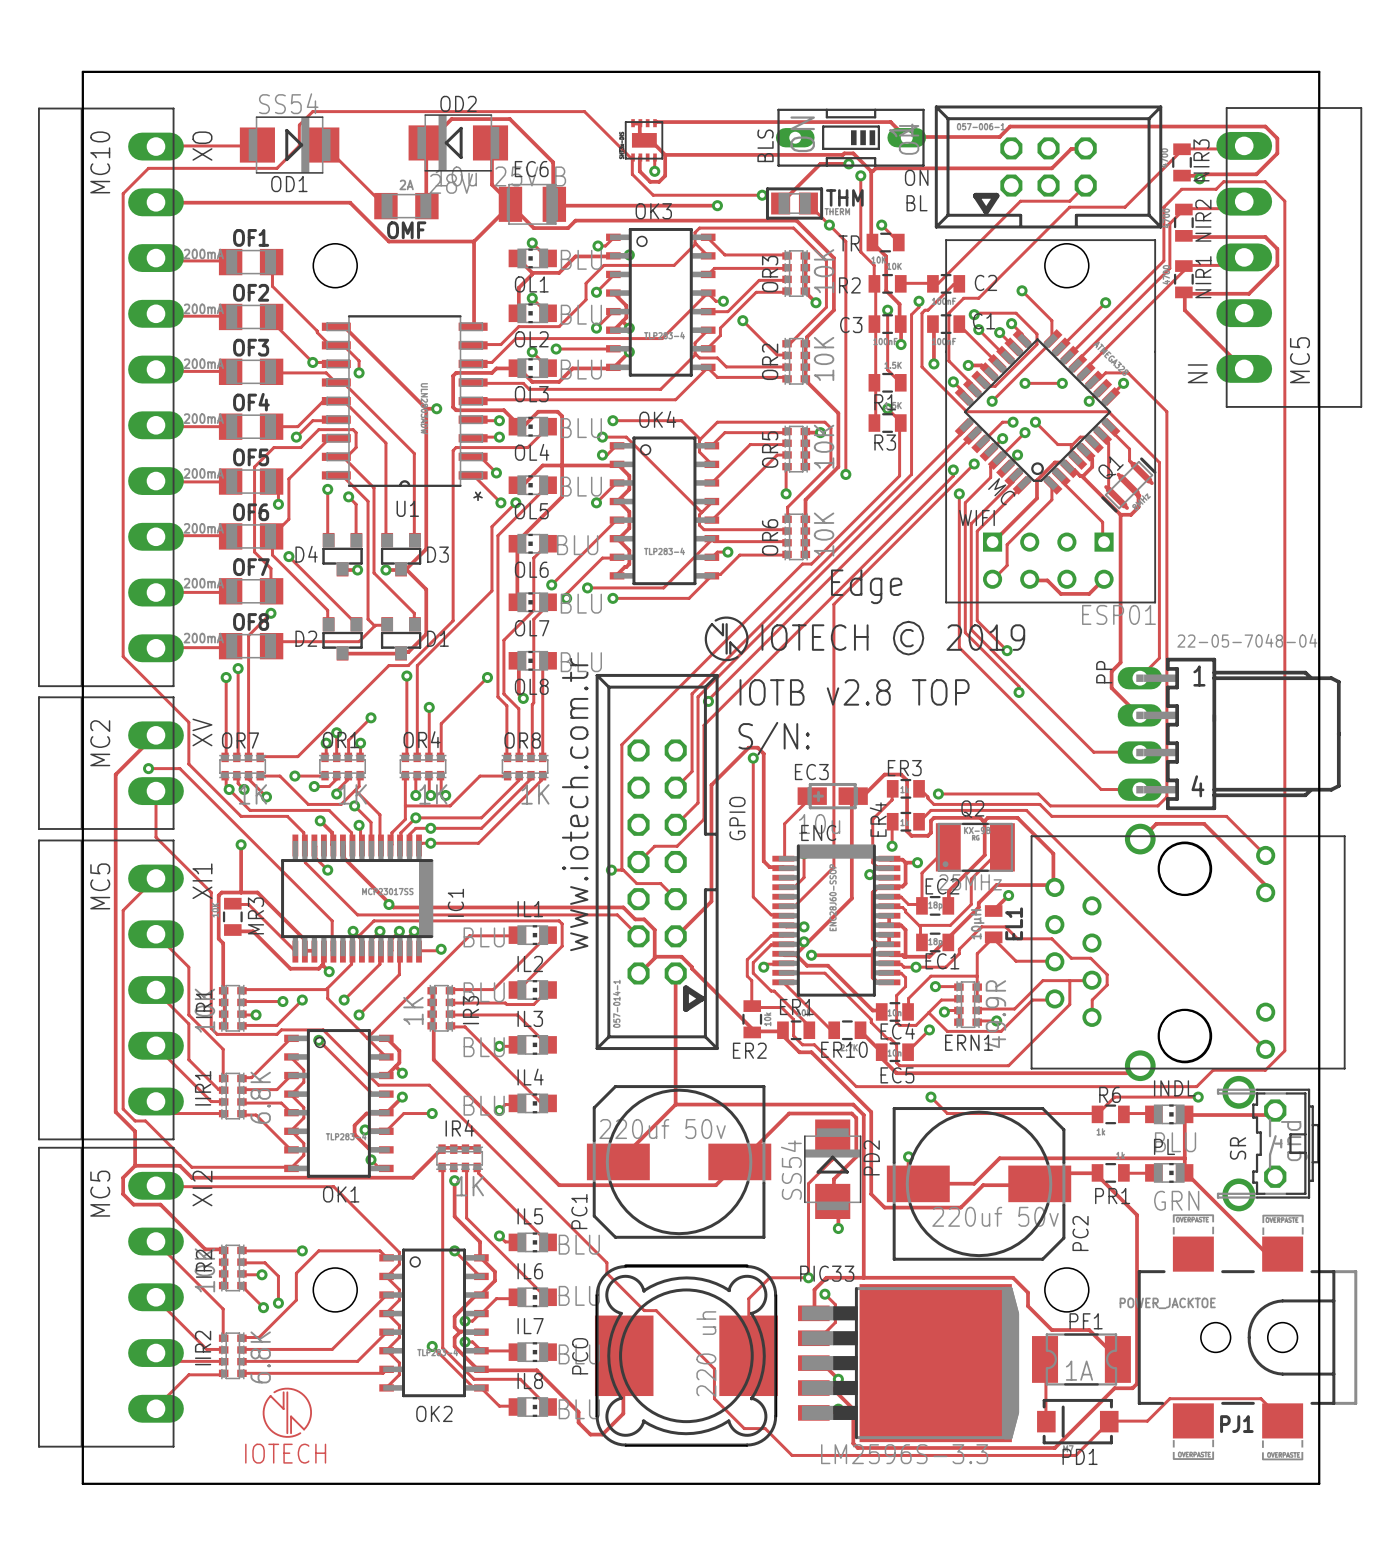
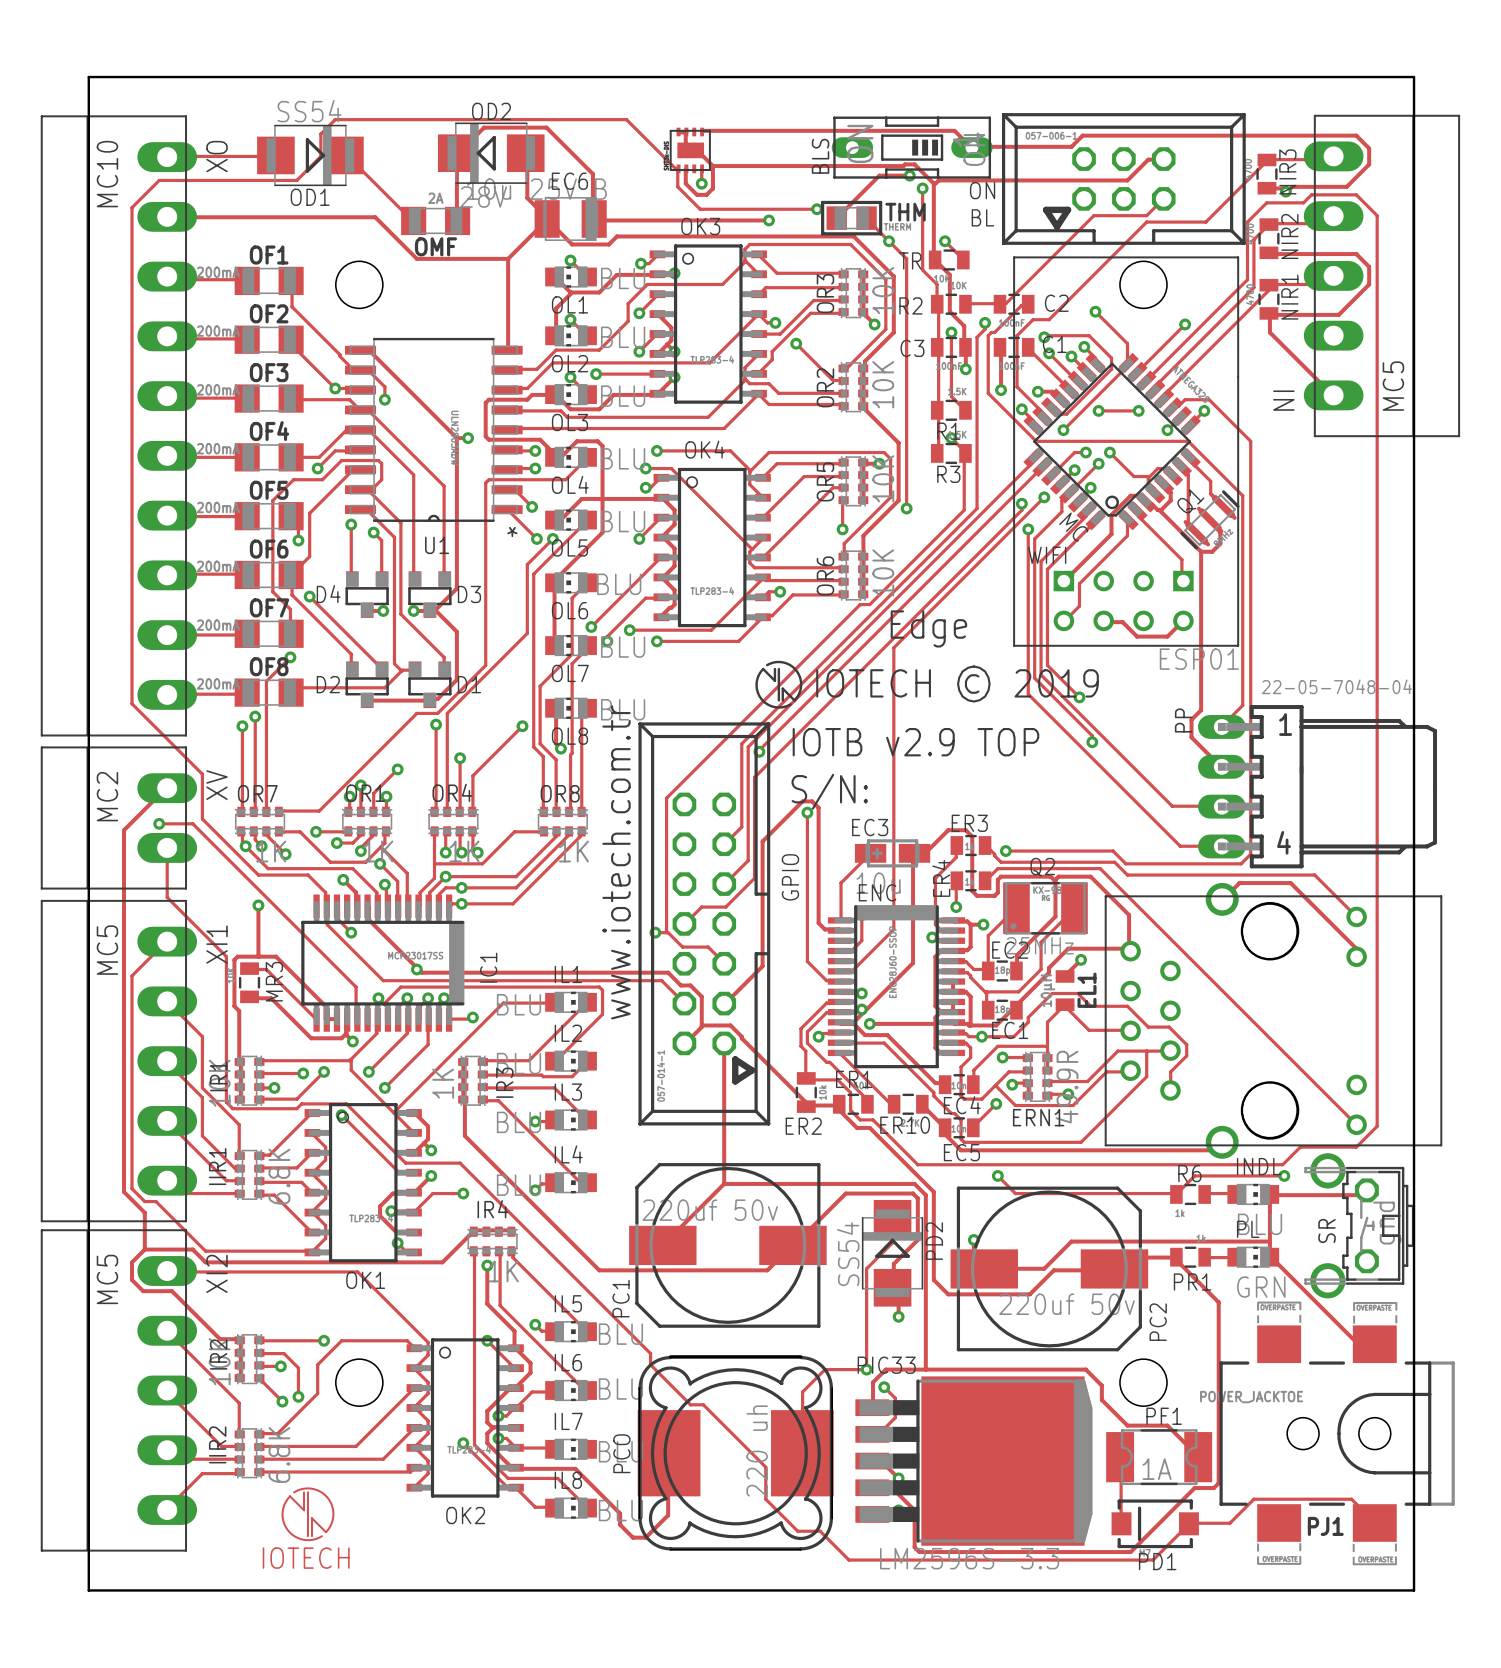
text: IOTB v2.8 TOP (854, 692) -> IOTB v2.9 TOP (915, 742)

